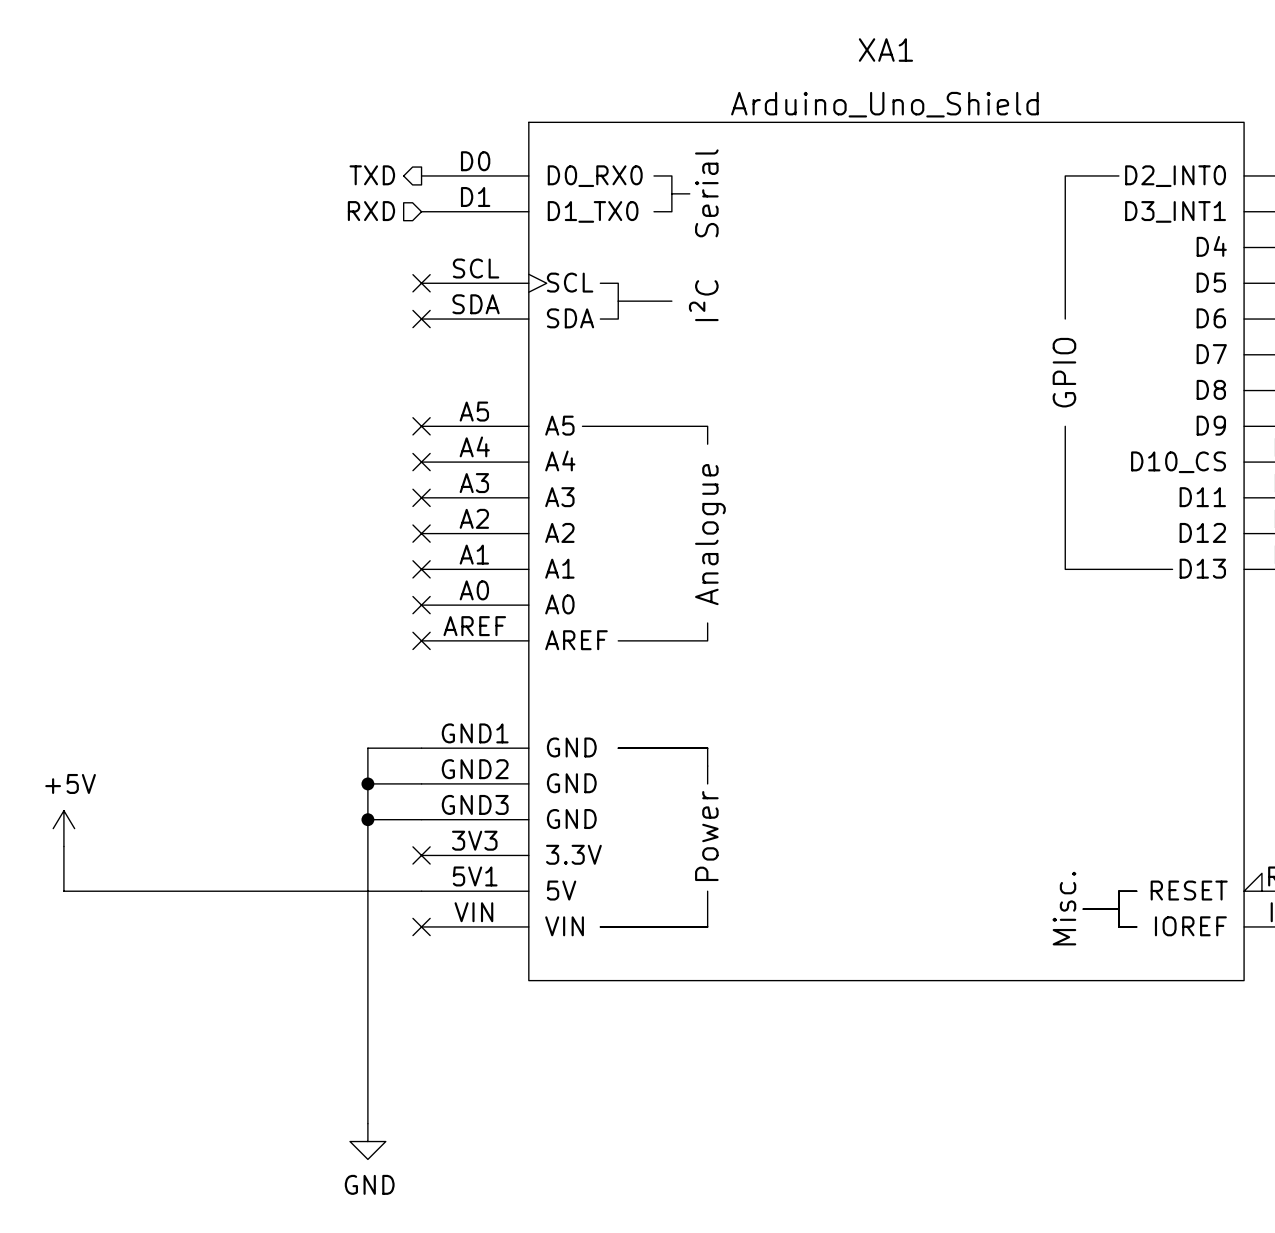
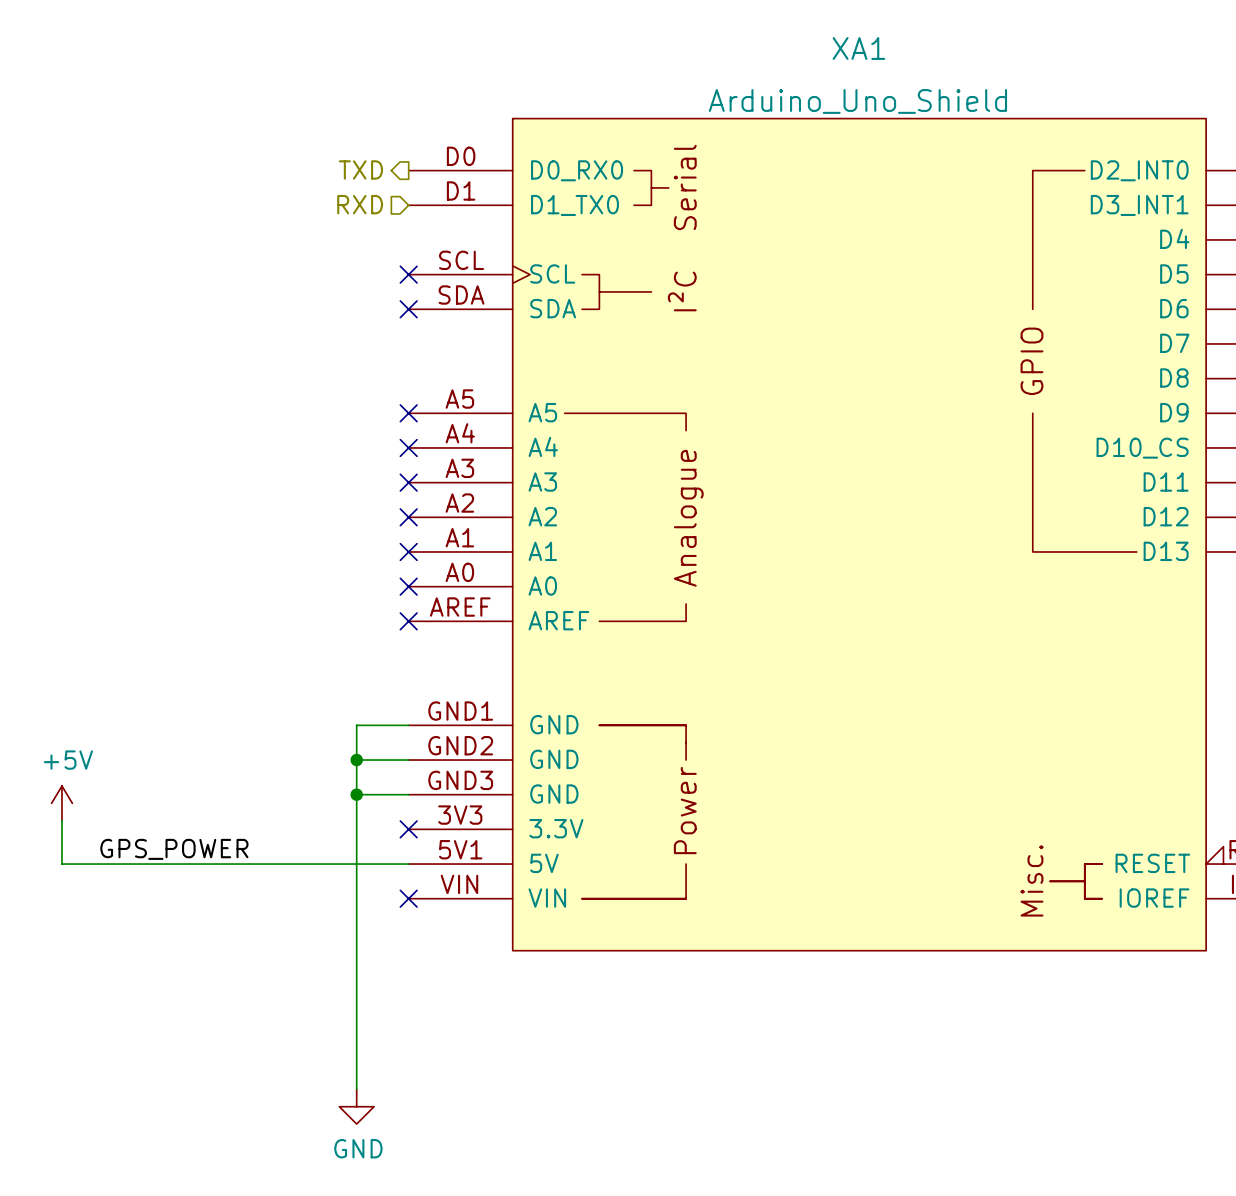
label: none -> GPS_POWER (174, 849)

